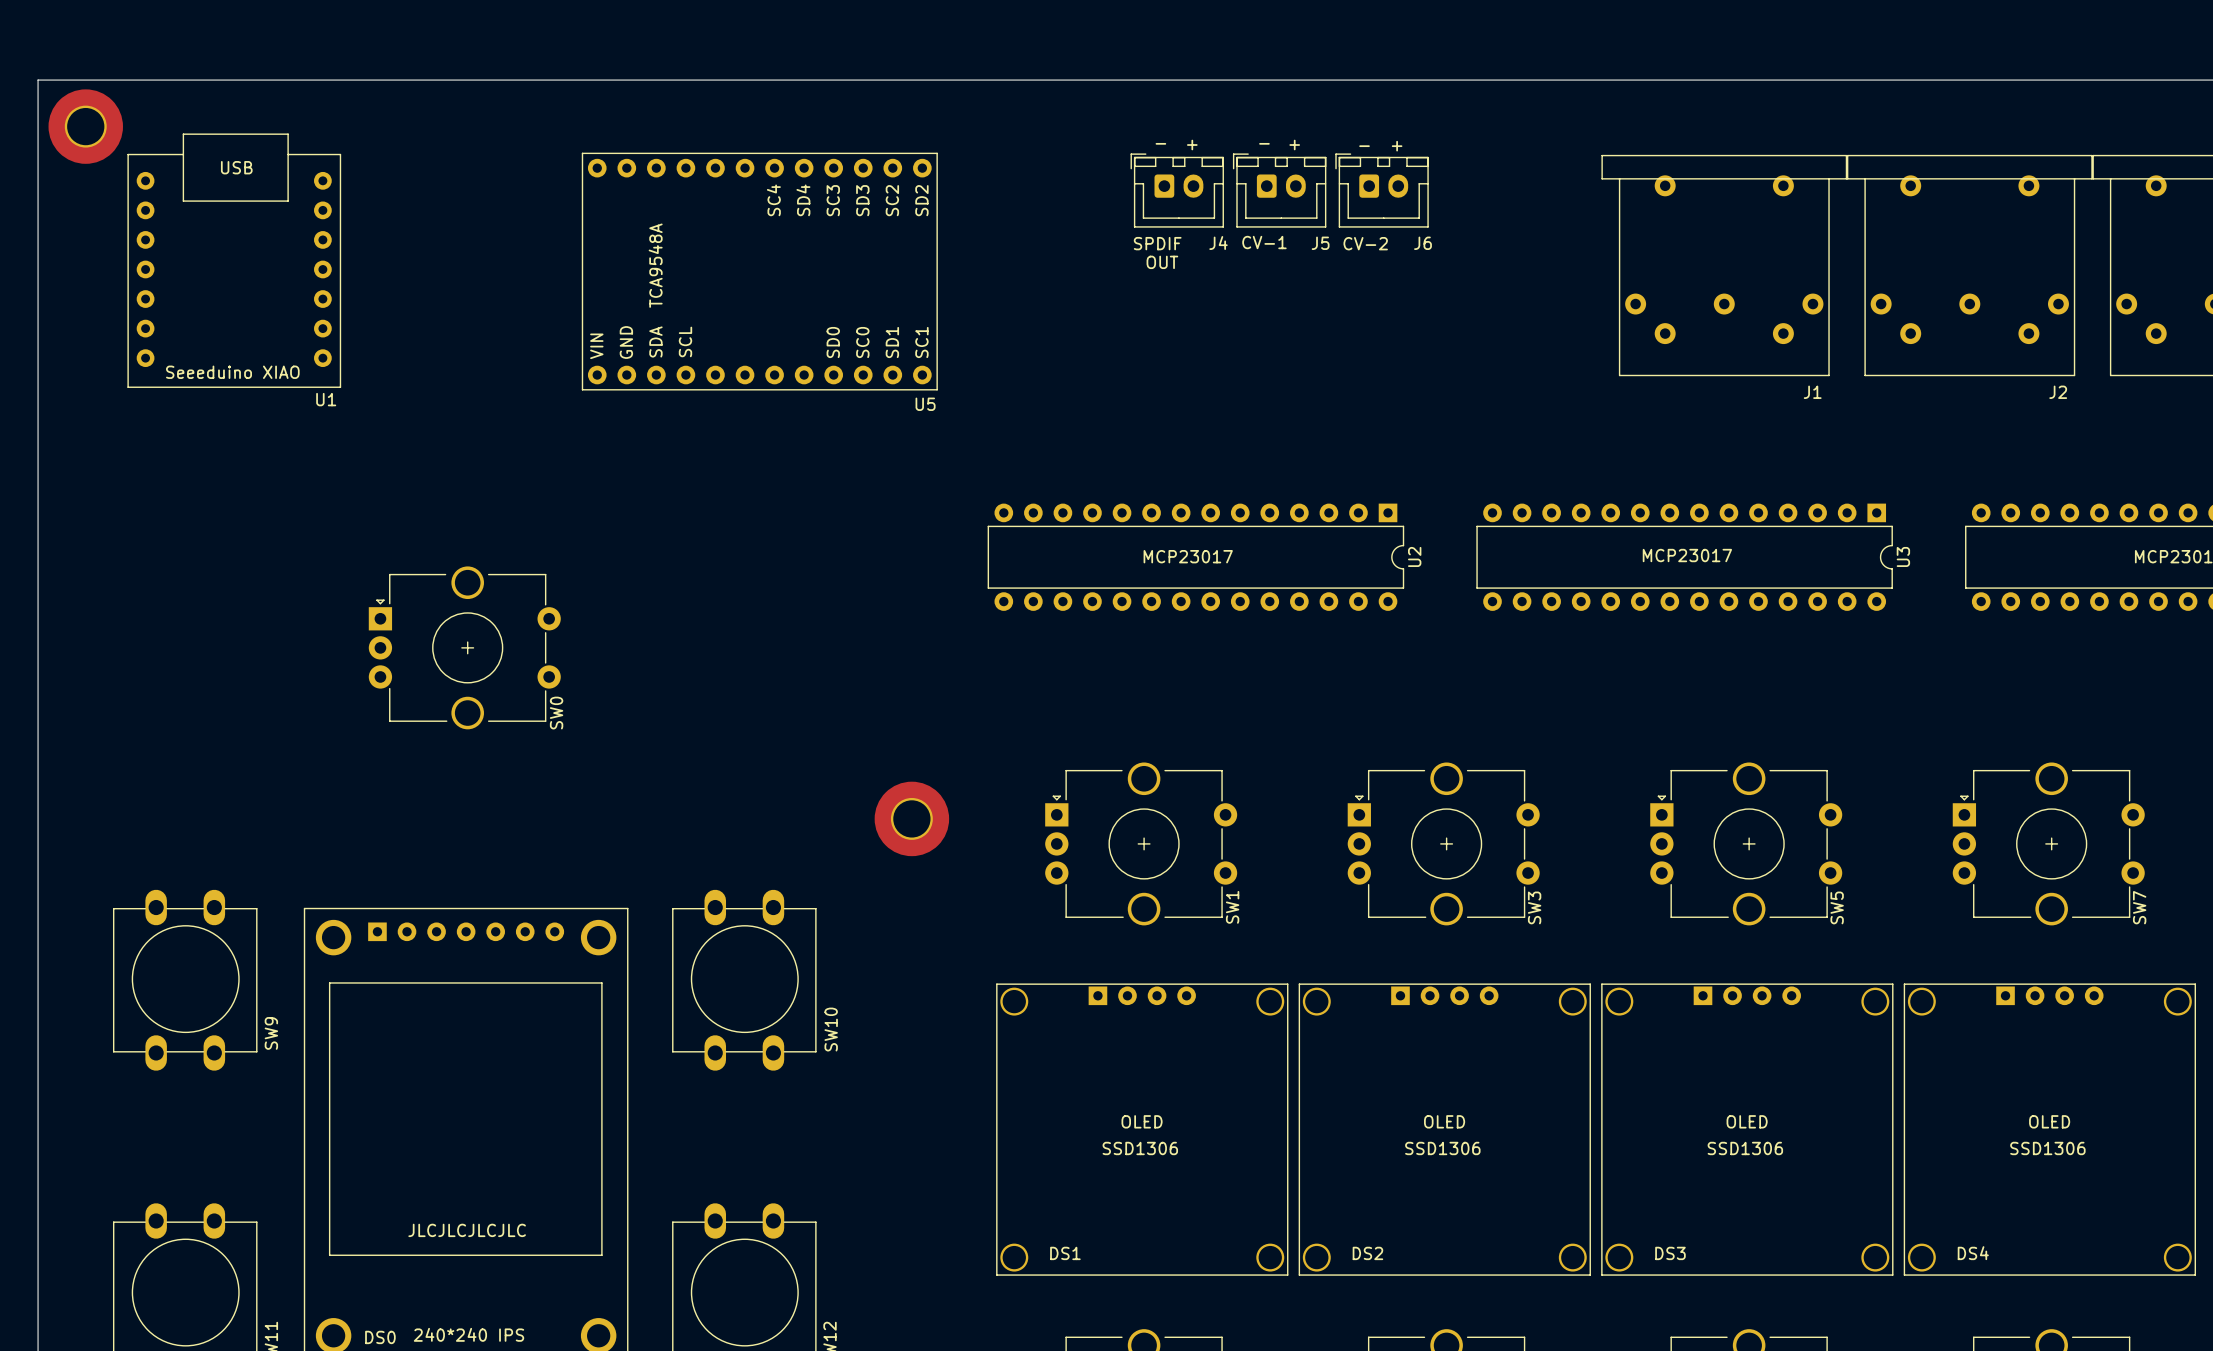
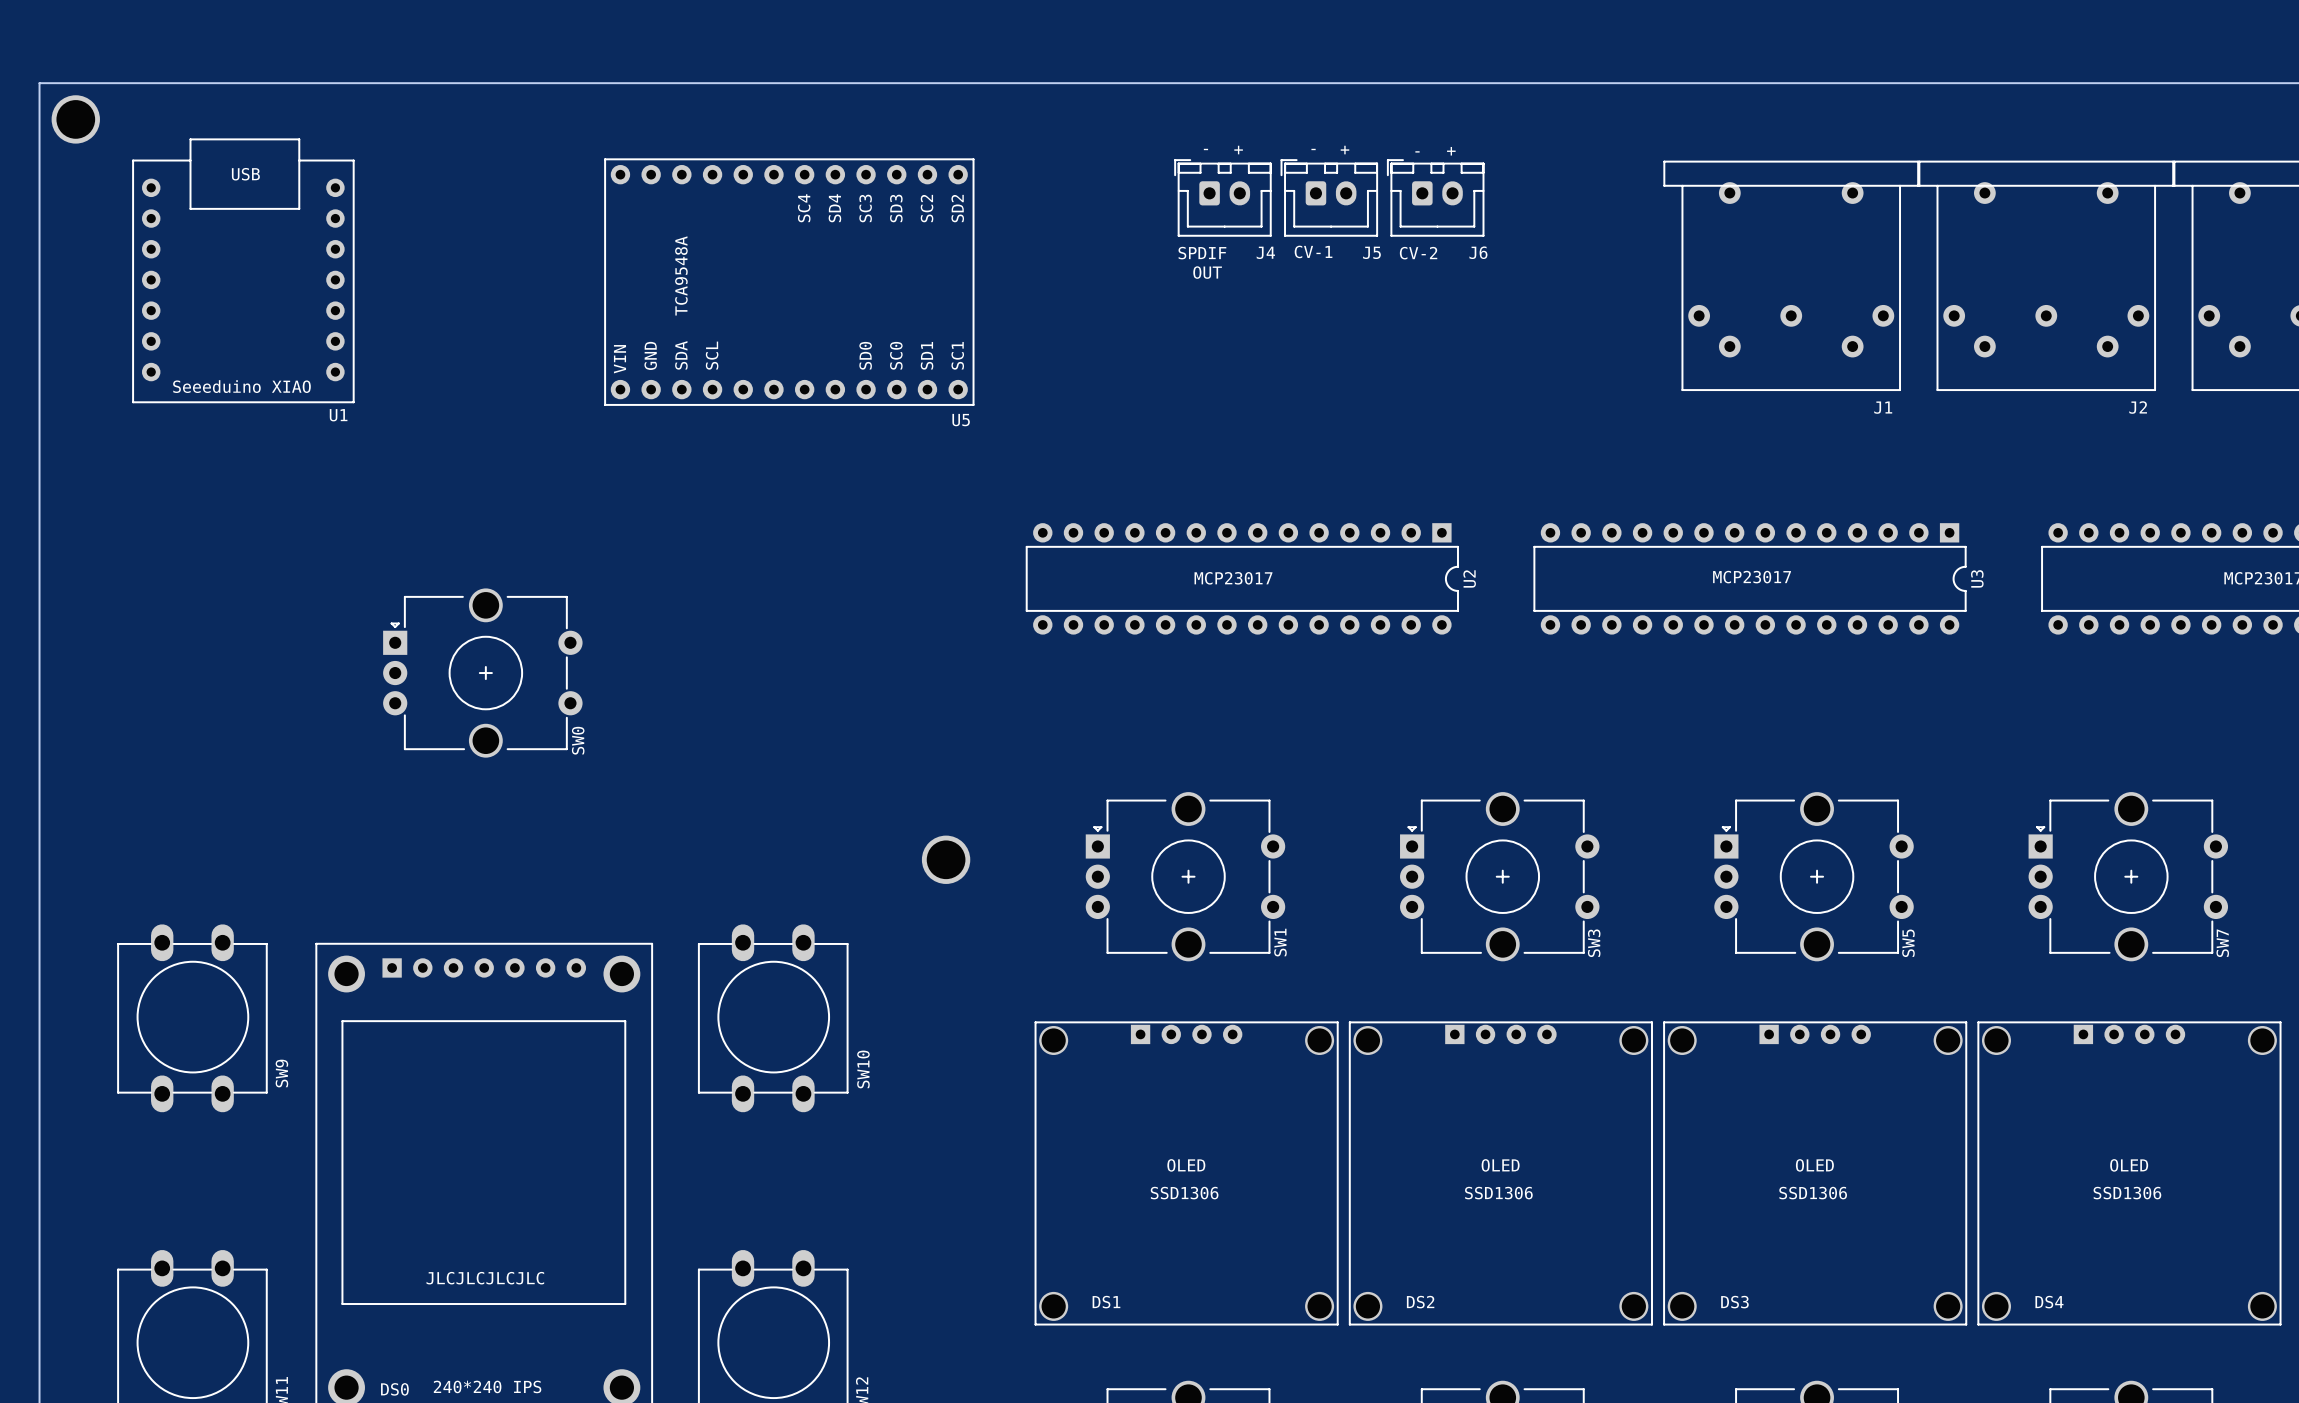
part: none -> (75, 119)
part: (85, 126) -> none
part footprint: [874, 781, 950, 857] -> [921, 835, 971, 884]

